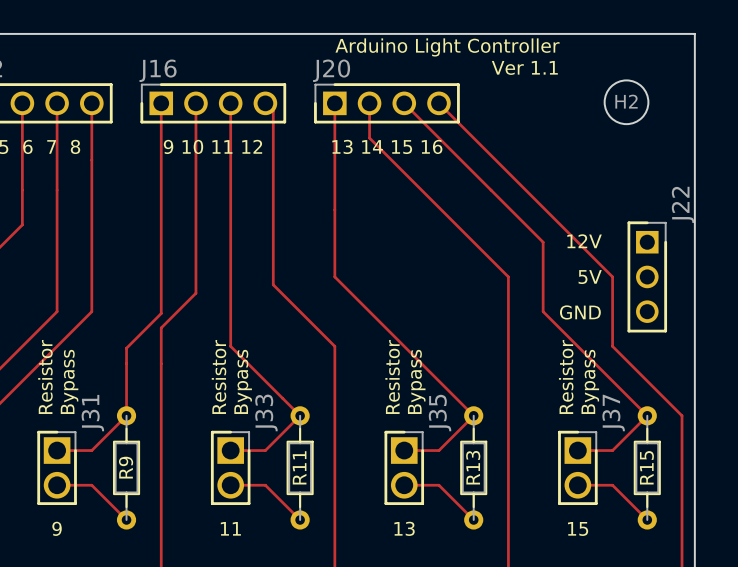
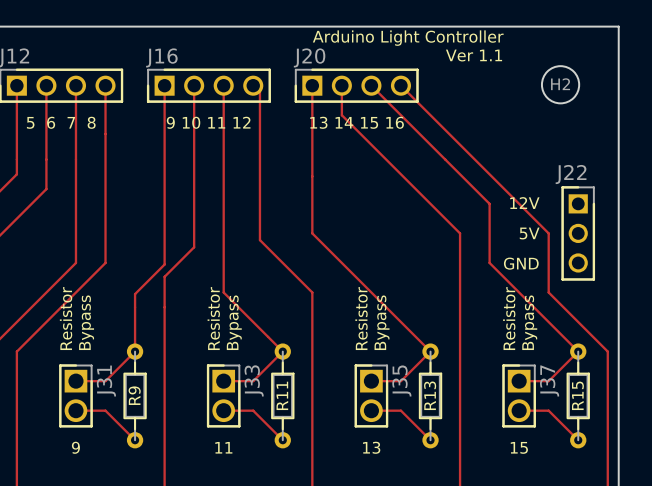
J22 name rotation: 0° (683, 204) -> 90° clockwise (571, 174)
J33 name position: J33 (266, 412) -> J33 (254, 380)
J31 name position: J31 (92, 413) -> J31 (106, 381)
J35 name position: J35 (440, 413) -> J35 (401, 380)
J37 name position: J37 (613, 413) -> J37 (549, 380)

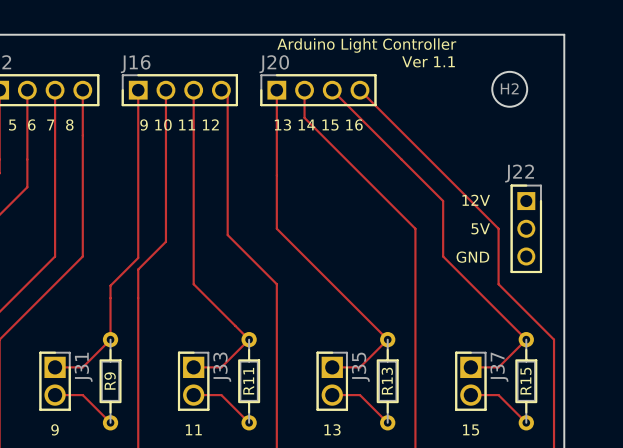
text: Resistor (66, 318) -> none
text: Resistor (213, 318) -> none
text: Resistor (361, 318) -> none
text: Resistor (509, 318) -> none
text: Bypass (86, 322) -> none
text: Bypass (234, 322) -> none
text: Bypass (382, 322) -> none
text: Bypass (529, 322) -> none

